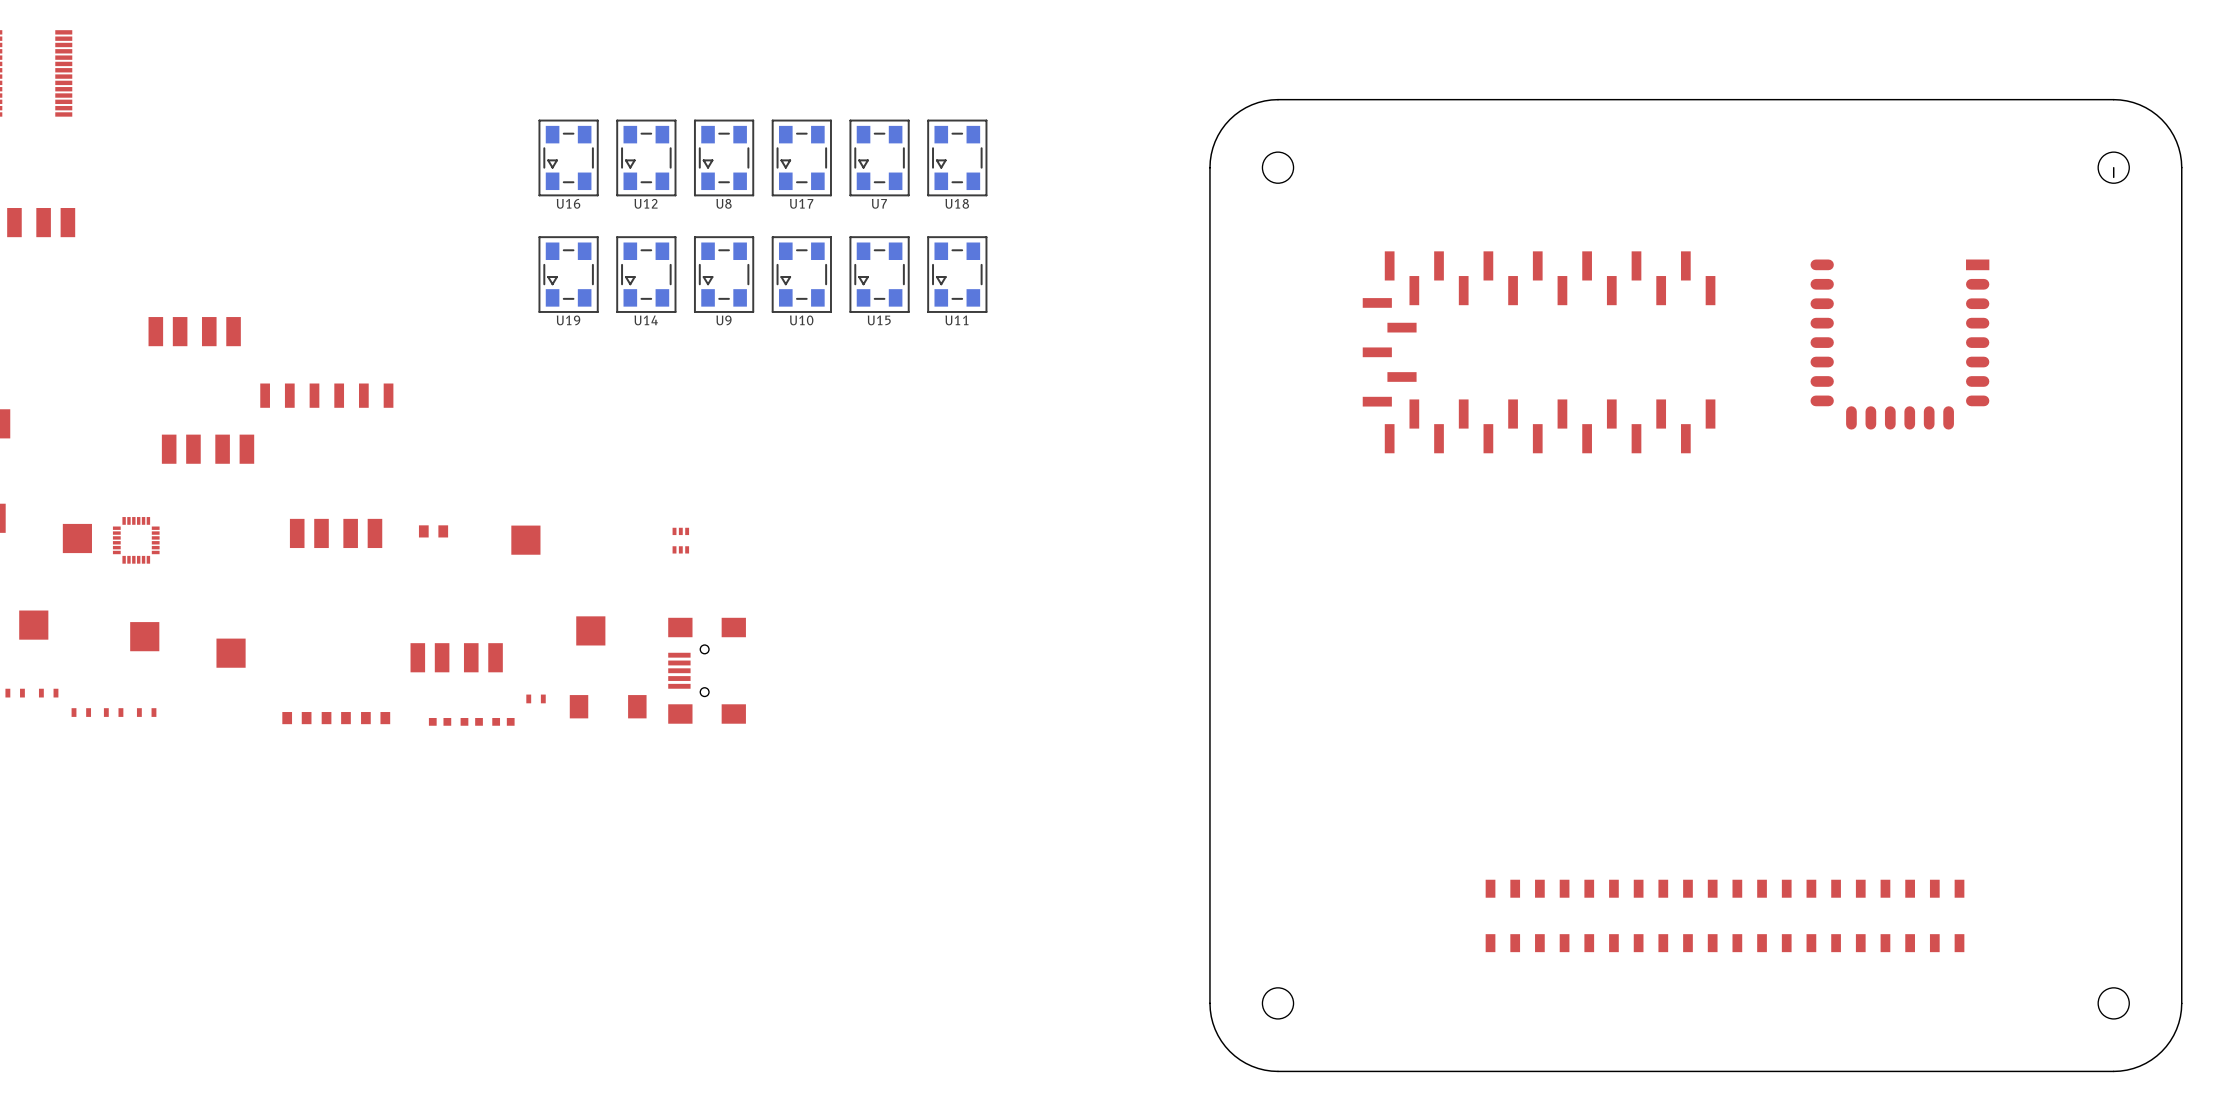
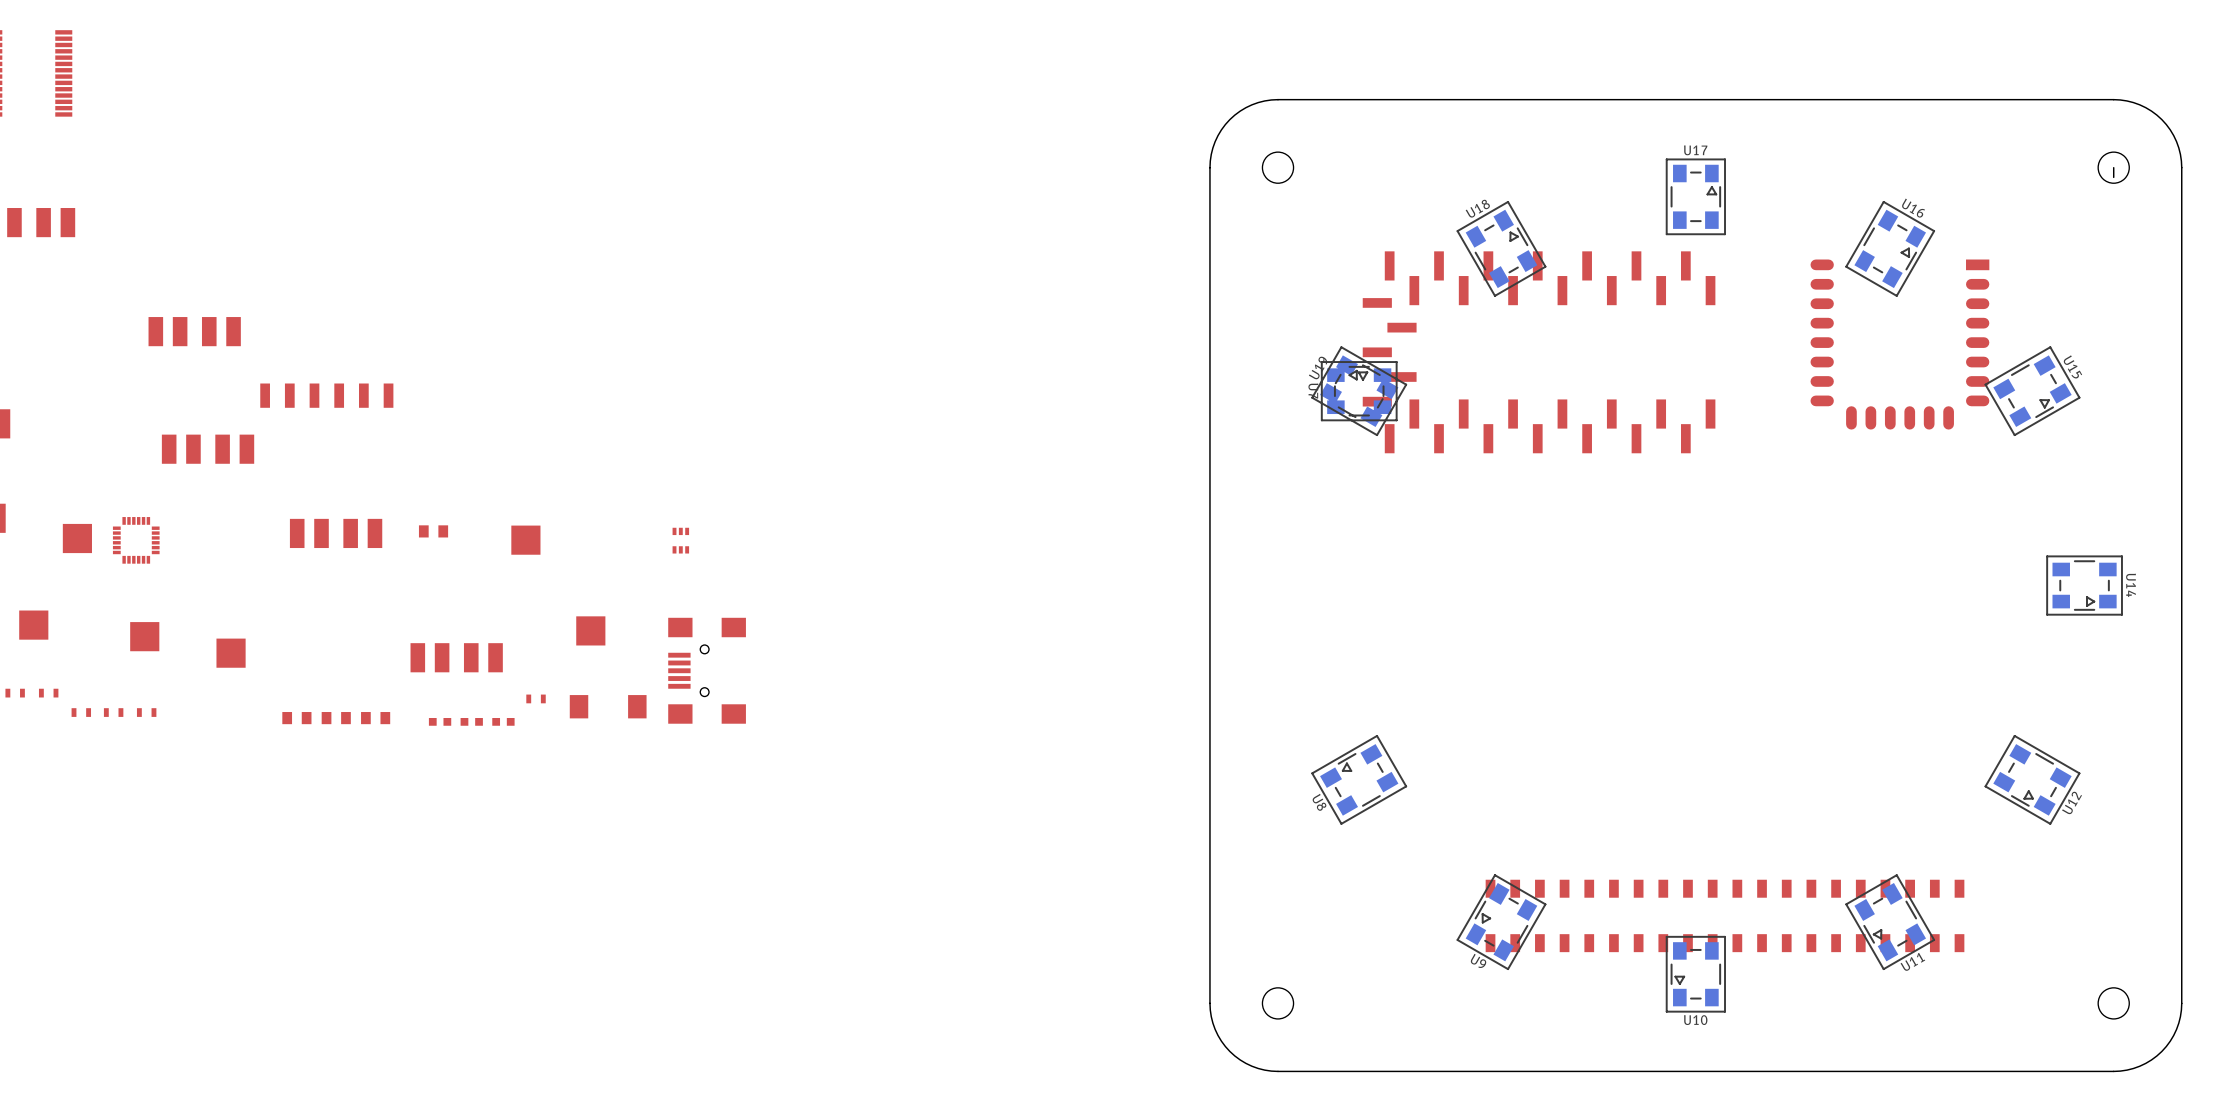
U16 rotation: 0° (568, 157) -> 150° counterclockwise (1890, 248)
U16 position: (568, 157) -> (1890, 248)
U12 rotation: 0° (646, 157) -> 60° counterclockwise (2032, 779)
U12 position: (646, 157) -> (2032, 779)
U8 rotation: 0° (724, 157) -> 60° clockwise (1359, 779)
U8 position: (724, 157) -> (1359, 779)
U17 rotation: 0° (801, 157) -> 180° (1695, 196)
U17 position: (801, 157) -> (1695, 196)
U7 rotation: 0° (879, 157) -> 90° clockwise (1359, 391)
U7 position: (879, 157) -> (1359, 391)
U18 rotation: 0° (957, 157) -> 150° clockwise (1501, 248)
U18 position: (957, 157) -> (1501, 248)
U19 rotation: 0° (568, 274) -> 120° clockwise (1359, 391)
U19 position: (568, 274) -> (1359, 391)
U14 rotation: 0° (646, 274) -> 90° counterclockwise (2084, 585)
U14 position: (646, 274) -> (2084, 585)
U9 rotation: 0° (724, 274) -> 30° clockwise (1501, 922)
U9 position: (724, 274) -> (1501, 922)
U10 position: (801, 274) -> (1695, 974)
U15 rotation: 0° (879, 274) -> 120° counterclockwise (2032, 391)
U15 position: (879, 274) -> (2032, 391)
U11 rotation: 0° (957, 274) -> 30° counterclockwise (1890, 922)
U11 position: (957, 274) -> (1890, 922)

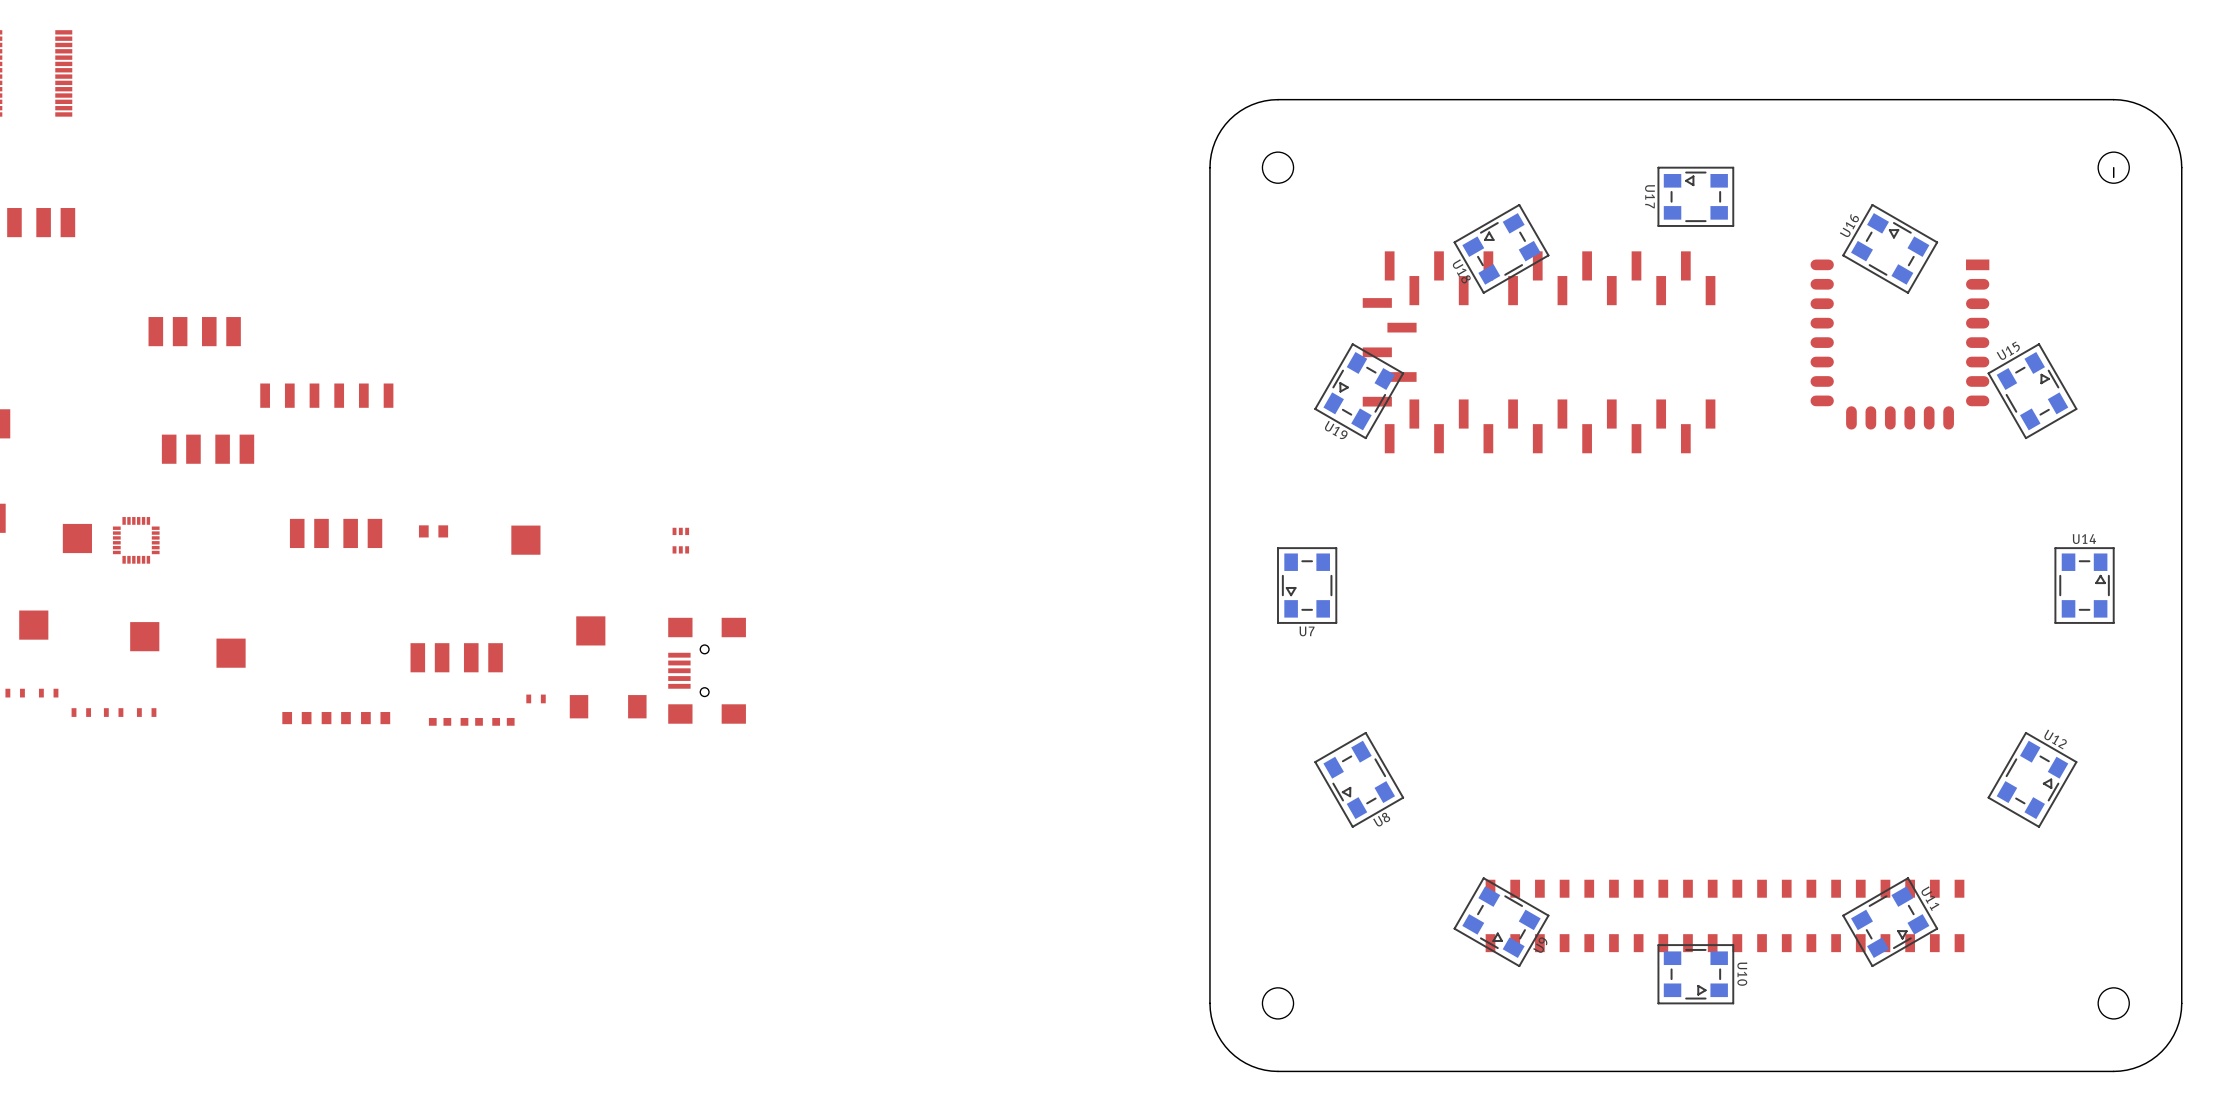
U17 rotation: 0° (1695, 196) -> 90° counterclockwise (1695, 196)
U18 rotation: 0° (1501, 248) -> 90° counterclockwise (1501, 248)
U16 rotation: 0° (1890, 248) -> 90° counterclockwise (1890, 248)
U7 rotation: 0° (1359, 391) -> 90° counterclockwise (1307, 585)
U7 position: (1359, 391) -> (1307, 585)
U19 rotation: 0° (1359, 391) -> 90° counterclockwise (1359, 391)
U15 rotation: 0° (2032, 391) -> 90° counterclockwise (2032, 391)
U14 rotation: 0° (2084, 585) -> 90° counterclockwise (2084, 585)
U8 rotation: 0° (1359, 779) -> 90° counterclockwise (1359, 779)
U12 rotation: 0° (2032, 779) -> 90° counterclockwise (2032, 779)
U9 rotation: 0° (1501, 922) -> 90° counterclockwise (1501, 922)
U11 rotation: 0° (1890, 922) -> 90° counterclockwise (1890, 922)
U10 rotation: 0° (1695, 974) -> 90° counterclockwise (1695, 974)

